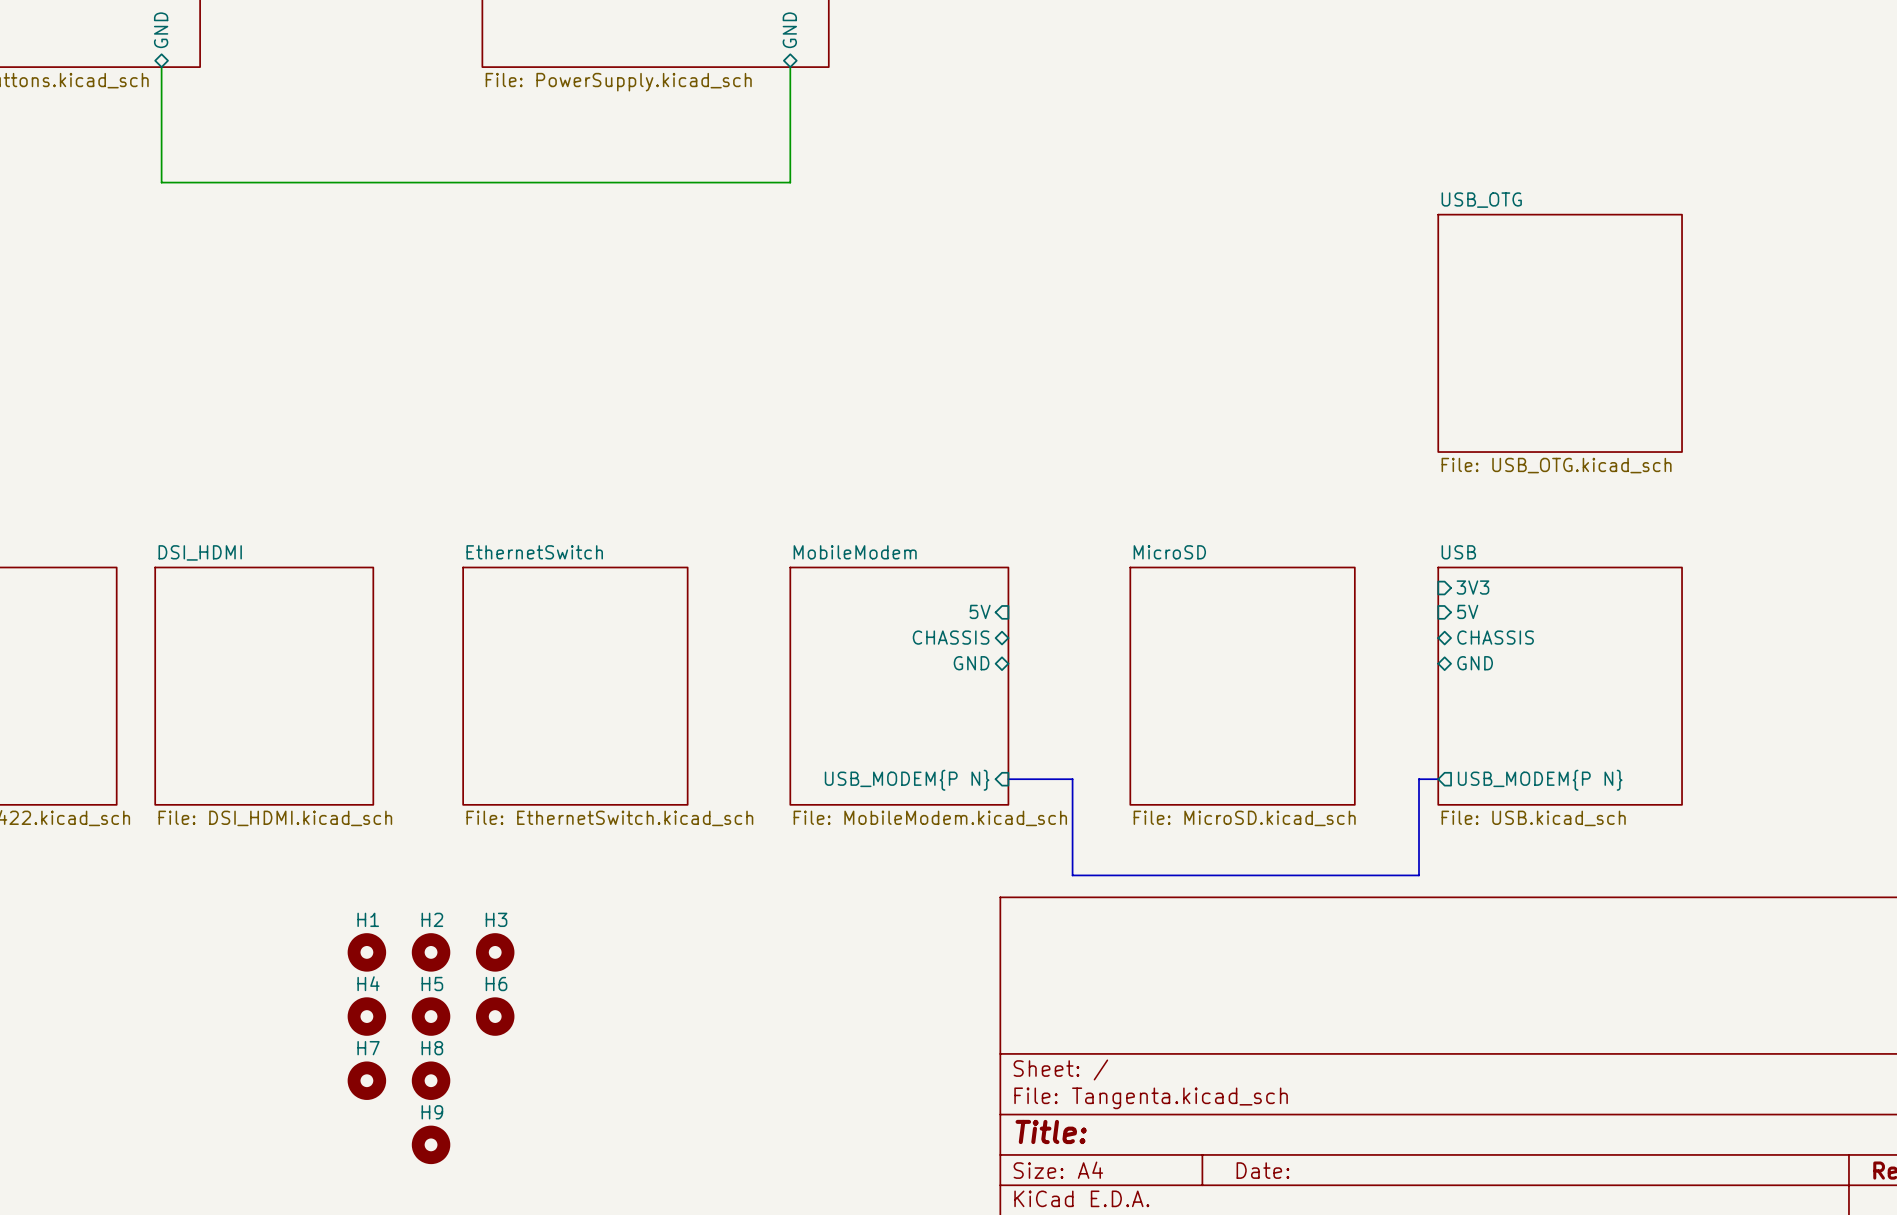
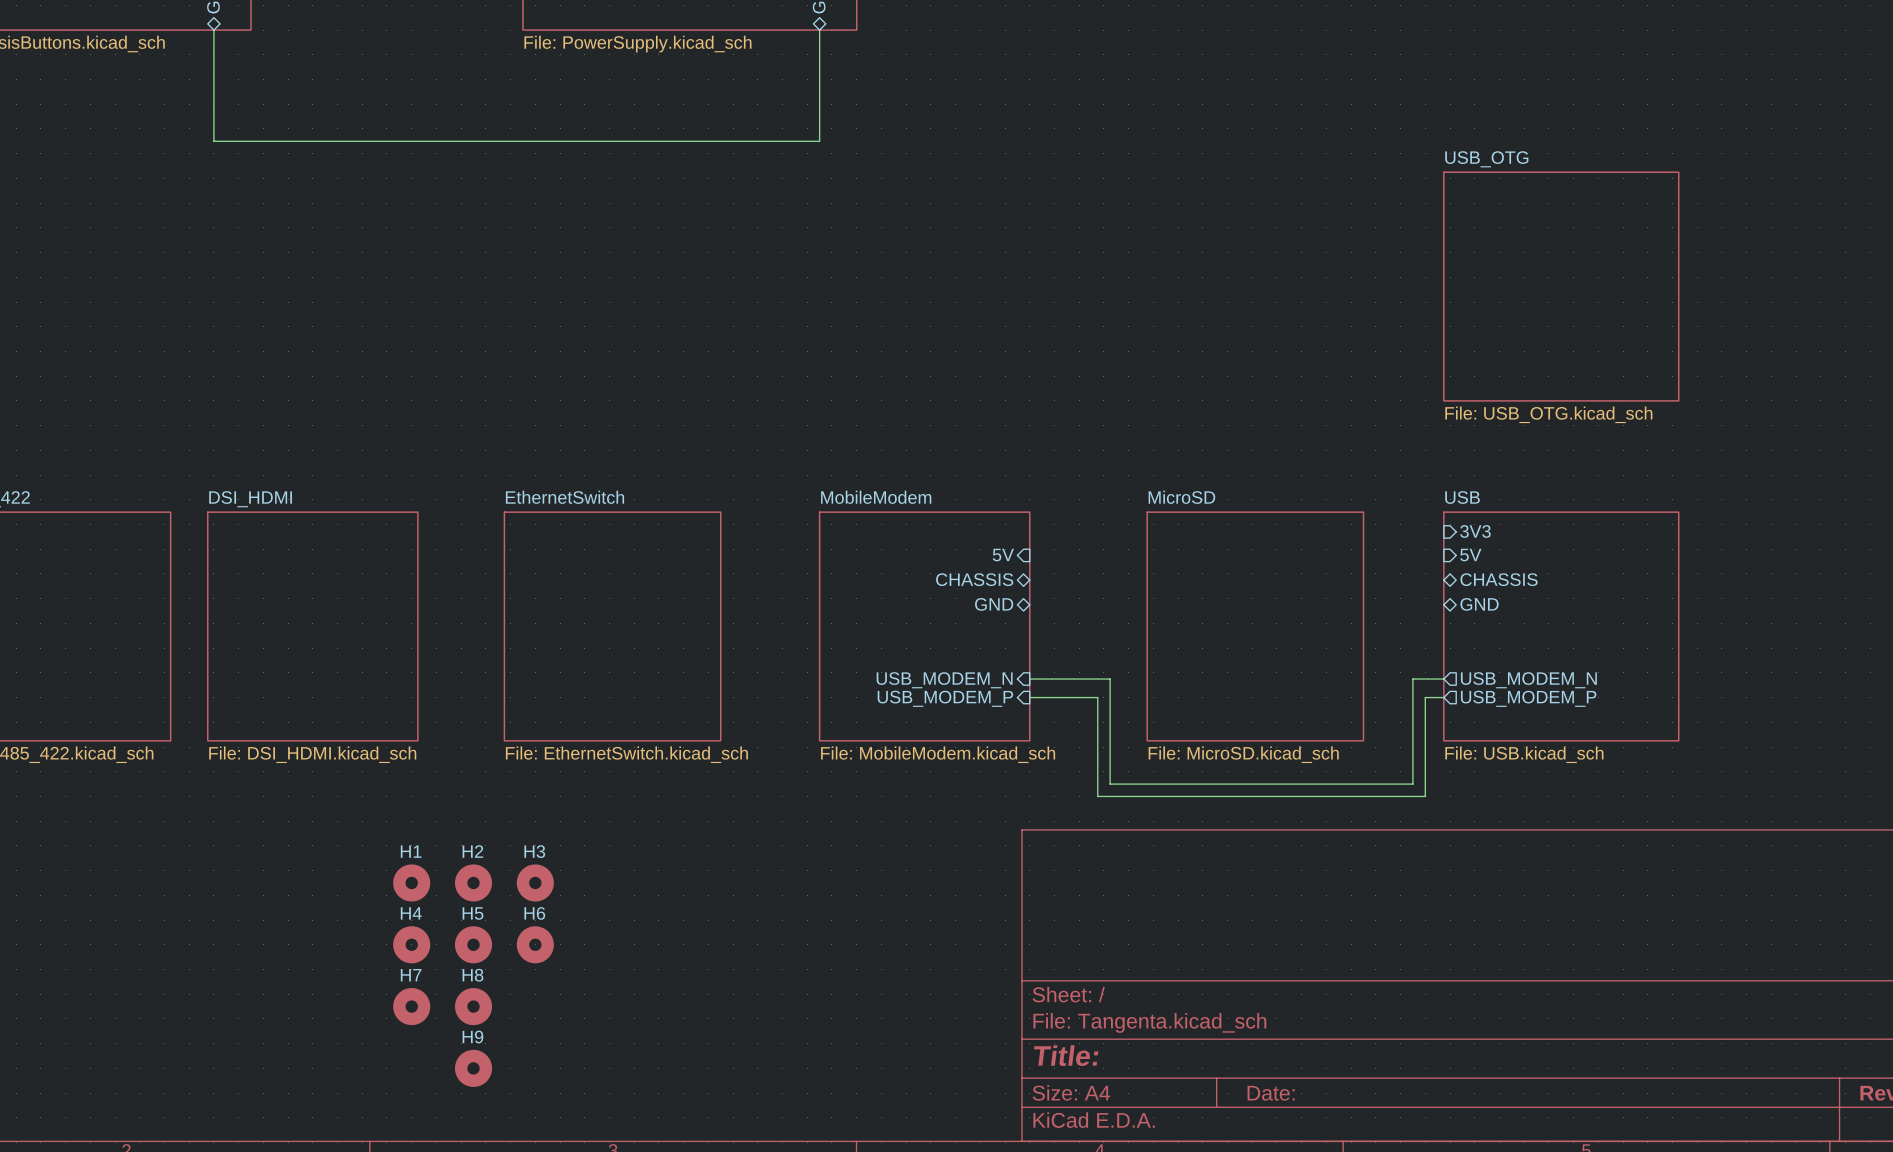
sheet pin: none -> USB_MODEM_N (944, 680)
wire: none -> (1029, 679) (1110, 679) (1110, 784) (1412, 784) (1412, 679) (1443, 679)
sheet pin: none -> USB_MODEM_N (1528, 680)
wire: none -> (1029, 697) (1097, 697) (1097, 796) (1425, 796) (1425, 697) (1443, 697)
bus: (1008, 779) (1072, 779) (1072, 875) (1419, 875) (1419, 779) (1438, 779) -> none
sheet pin: USB_MODEM{P N} (907, 780) -> USB_MODEM_P (945, 698)
sheet pin: USB_MODEM{P N} (1540, 780) -> USB_MODEM_P (1528, 698)

